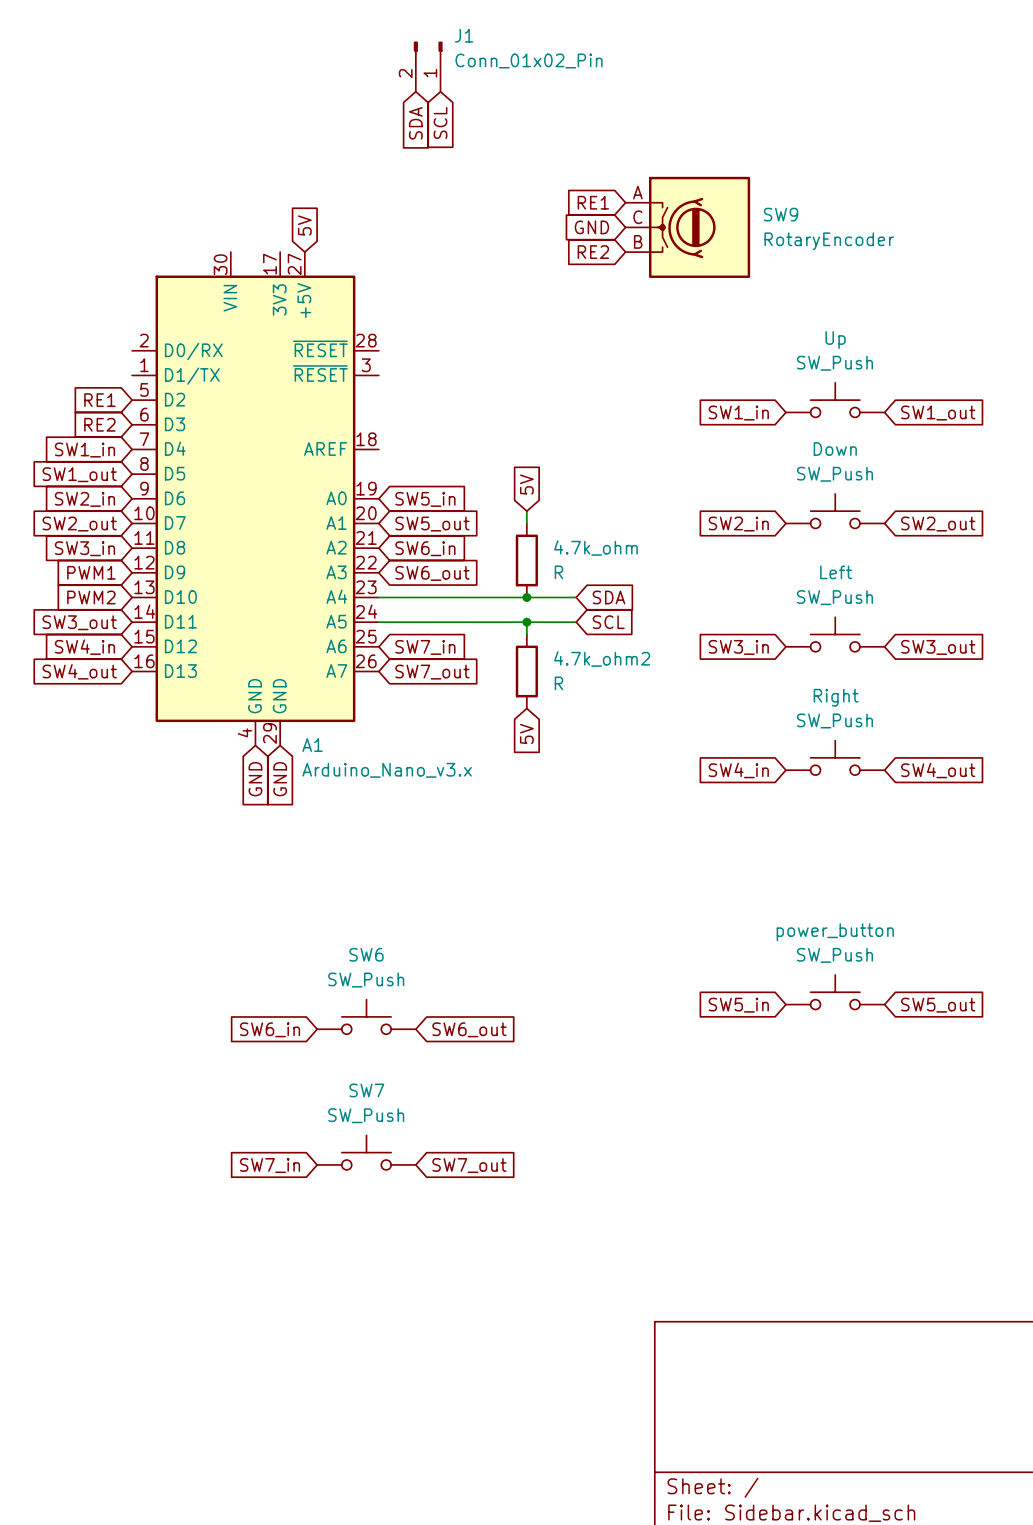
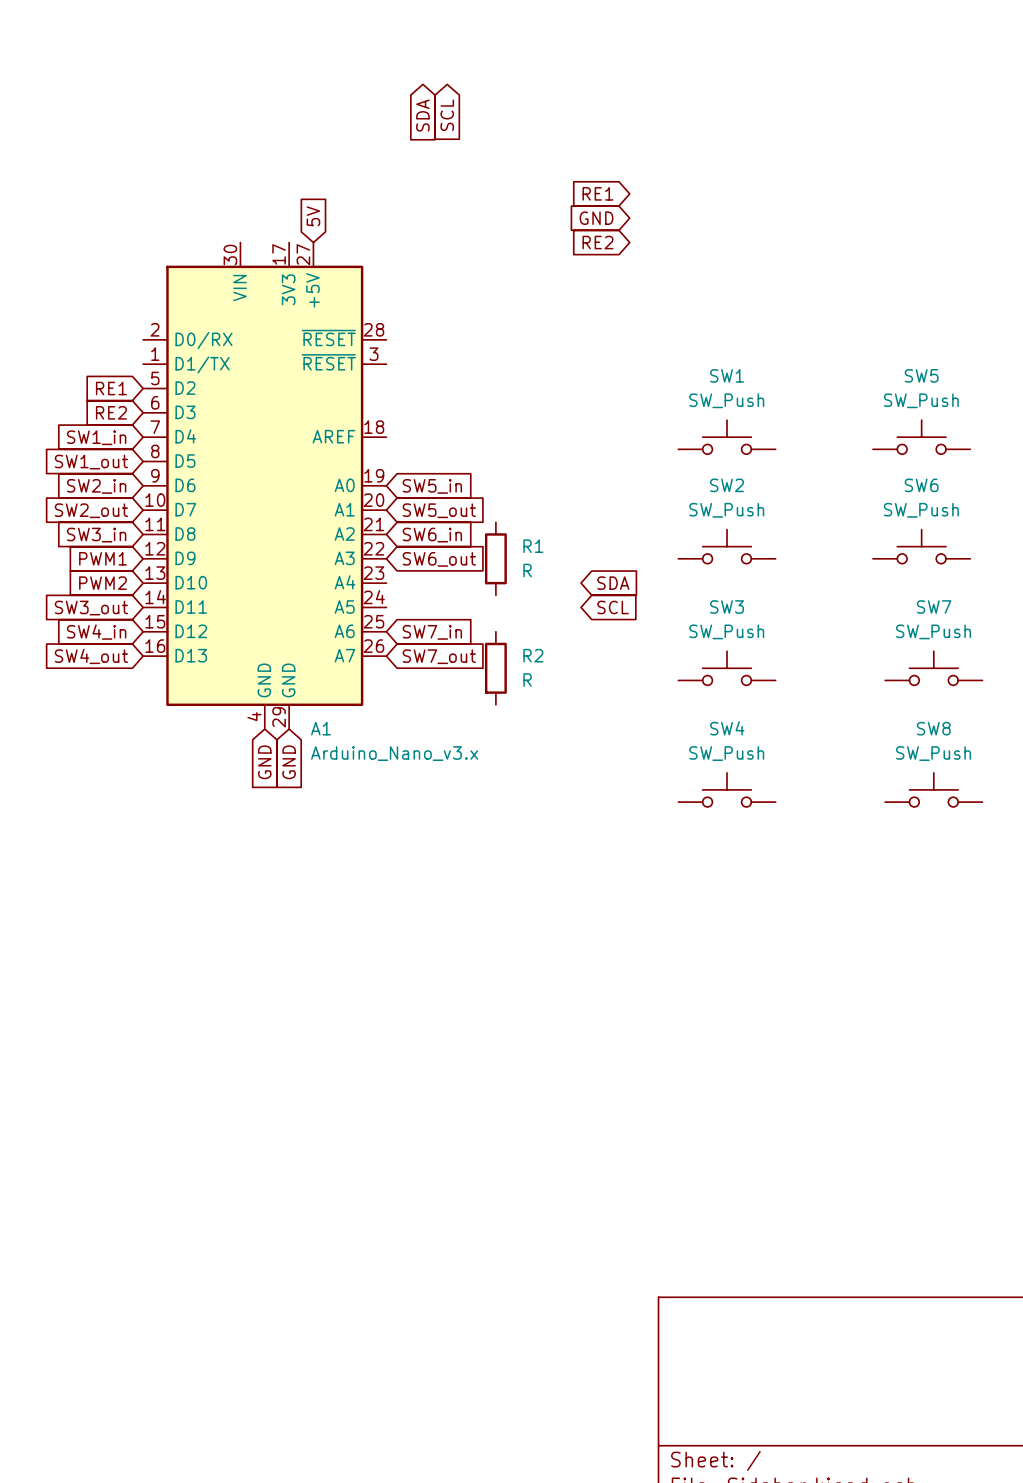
J1: Conn_01x02_Pin (428, 66) -> none
SW9: RotaryEncoder (687, 227) -> none
Up: SW_Push (835, 400) -> none
global label: SW1_in (738, 413) -> none
global label: SW1_out (938, 413) -> none
SW1: none -> SW_Push (727, 437)
SW5: none -> SW_Push (921, 437)
global label: 5V (526, 484) -> none
wire: (526, 511) (526, 523) -> none
Down: SW_Push (835, 511) -> none
global label: SW2_in (738, 524) -> none
global label: SW2_out (938, 524) -> none
4.7k_ohm: R (526, 560) -> none
SW2: none -> SW_Push (727, 546)
R1: none -> R (495, 558)
wire: (378, 597) (576, 597) -> none
junction: (526, 597) -> none
wire: (378, 622) (576, 622) -> none
wire: (526, 622) (526, 634) -> none
junction: (526, 622) -> none
Left: SW_Push (835, 634) -> none
global label: SW3_in (738, 647) -> none
global label: SW3_out (938, 647) -> none
4.7k_ohm2: R (526, 671) -> none
R2: none -> R (495, 668)
SW3: none -> SW_Push (727, 668)
global label: 5V (526, 733) -> none
Right: SW_Push (835, 757) -> none
global label: SW4_in (738, 770) -> none
global label: SW4_out (938, 770) -> none
SW4: none -> SW_Push (727, 789)
SW8: none -> SW_Push (933, 789)
power_button: SW_Push (835, 992) -> none
global label: SW5_in (738, 1005) -> none
global label: SW5_out (938, 1005) -> none
SW6 position: (366, 1016) -> (921, 546)
global label: SW6_in (269, 1029) -> none
global label: SW6_out (469, 1029) -> none
SW7 position: (366, 1152) -> (933, 668)
global label: SW7_in (269, 1165) -> none
global label: SW7_out (469, 1165) -> none

